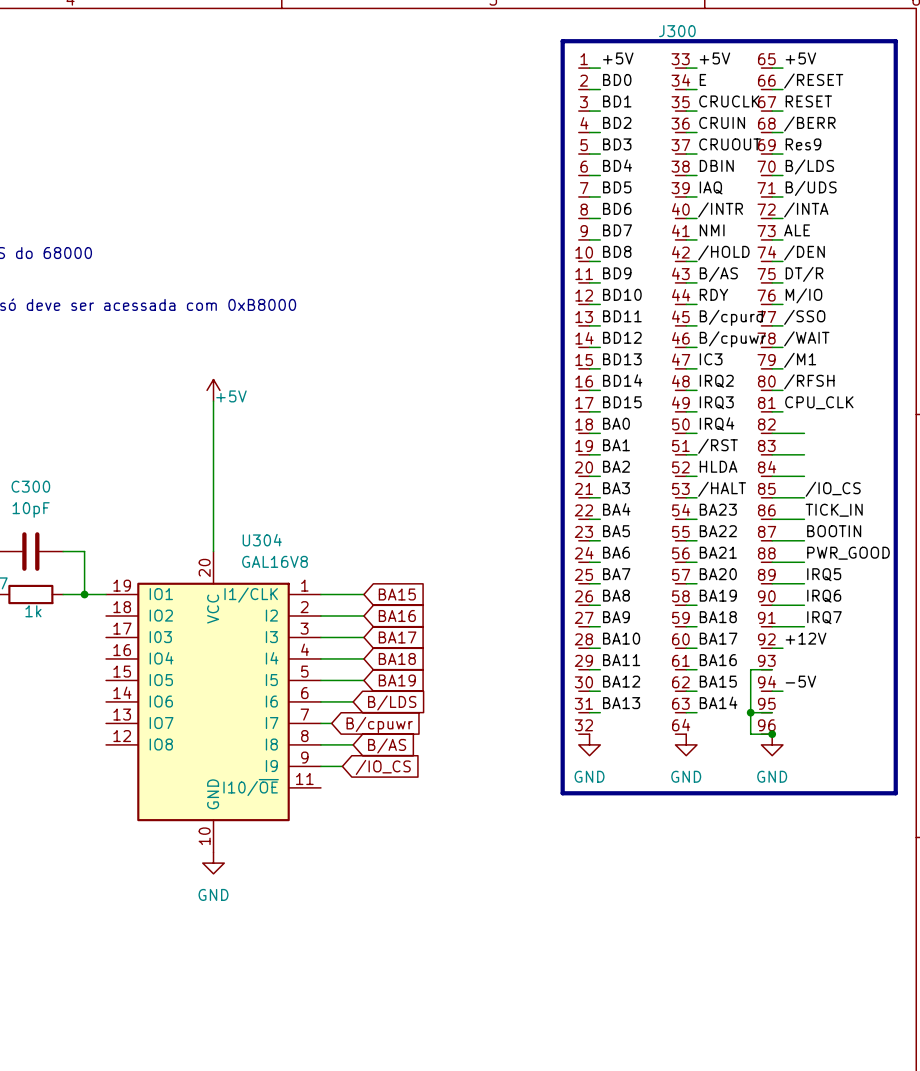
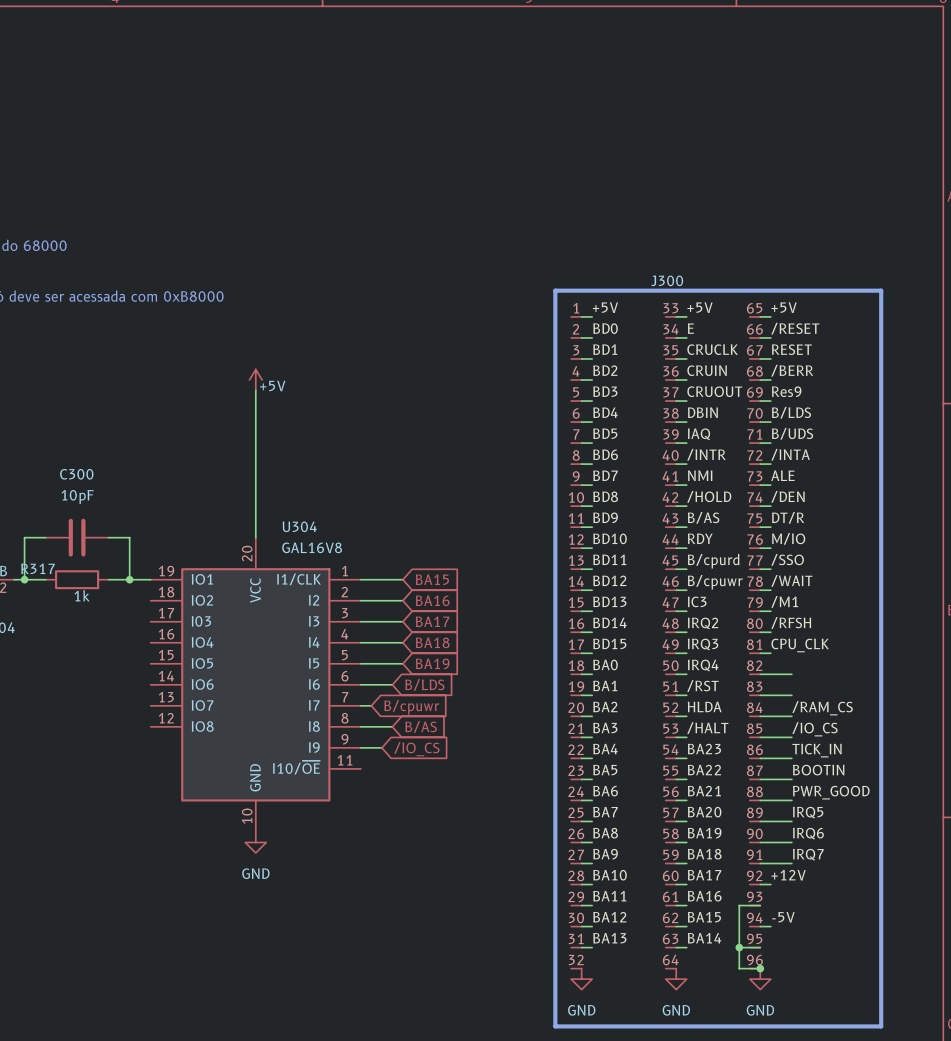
line: (562, 41) (895, 41) (895, 793) (562, 793) (562, 41) -> none
label: +5V (618, 58) -> none
label: +5V (714, 58) -> none
label: +5V (800, 58) -> none
wire: (589, 68) (600, 68) -> none
wire: (686, 68) (696, 68) -> none
wire: (772, 68) (782, 68) -> none
label: BD0 (617, 79) -> none
label: E (702, 79) -> none
label: /RESET (813, 80) -> none
wire: (589, 89) (600, 89) -> none
wire: (686, 89) (696, 89) -> none
wire: (772, 89) (782, 89) -> none
label: BD1 (617, 101) -> none
label: CRUCLK (729, 101) -> none
label: RESET (808, 101) -> none
wire: (589, 111) (600, 111) -> none
wire: (686, 111) (696, 111) -> none
wire: (772, 111) (782, 111) -> none
label: BD2 (617, 122) -> none
label: CRUIN (722, 122) -> none
label: /BERR (809, 123) -> none
wire: (589, 132) (600, 132) -> (581, 316) (592, 316)
wire: (686, 132) (696, 132) -> (676, 316) (686, 316)
wire: (772, 132) (782, 132) -> (760, 316) (770, 316)
label: BD3 (617, 144) -> none
label: CRUOUT (730, 144) -> none
label: Res9 (803, 144) -> none
wire: (589, 154) (600, 154) -> (581, 337) (592, 337)
wire: (686, 154) (696, 154) -> (676, 337) (686, 337)
wire: (772, 154) (782, 154) -> (760, 337) (770, 337)
label: BD4 (617, 165) -> none
label: DBIN (716, 165) -> none
label: B/LDS (809, 166) -> none
wire: (589, 175) (600, 175) -> (581, 358) (592, 358)
wire: (686, 175) (696, 175) -> (676, 358) (686, 358)
wire: (772, 175) (782, 175) -> (760, 358) (770, 358)
label: BD5 (617, 187) -> none
label: IAQ (711, 187) -> none
label: B/UDS (811, 188) -> none
wire: (589, 196) (600, 196) -> (581, 380) (592, 380)
wire: (686, 196) (696, 196) -> (676, 380) (686, 380)
wire: (772, 196) (782, 196) -> (760, 380) (770, 380)
label: BD6 (617, 208) -> none
label: /INTR (720, 209) -> none
label: /INTA (806, 209) -> none
wire: (589, 218) (600, 218) -> (581, 401) (592, 401)
wire: (686, 218) (696, 218) -> (676, 401) (686, 401)
wire: (772, 218) (782, 218) -> (760, 401) (770, 401)
label: BD7 (617, 230) -> none
label: NMI (712, 230) -> none
label: ALE (797, 230) -> none
wire: (589, 239) (600, 239) -> (581, 422) (592, 422)
wire: (686, 239) (696, 239) -> (676, 422) (686, 422)
wire: (772, 239) (782, 239) -> (760, 422) (770, 422)
label: BD8 (617, 251) -> none
label: /HOLD (723, 252) -> none
label: /DEN (804, 252) -> none
wire: (589, 261) (600, 261) -> (581, 443) (592, 443)
wire: (686, 261) (696, 261) -> (676, 443) (686, 443)
wire: (772, 261) (782, 261) -> (760, 443) (770, 443)
label: BD9 (617, 273) -> none
label: B/AS (718, 274) -> none
label: DT/R (804, 274) -> none
wire: (589, 282) (600, 282) -> (581, 464) (592, 464)
wire: (686, 282) (696, 282) -> (676, 464) (686, 464)
wire: (772, 282) (782, 282) -> (760, 464) (770, 464)
label: BD10 (622, 294) -> none
label: RDY (713, 294) -> none
label: M/IO (803, 295) -> none
line: none -> (555, 290) (881, 290) (881, 1026) (555, 1026) (555, 290)
wire: (589, 304) (600, 304) -> (581, 485) (592, 485)
wire: (686, 304) (696, 304) -> (676, 485) (686, 485)
wire: (772, 304) (782, 304) -> (760, 485) (770, 485)
label: none -> +5V (605, 307)
label: BD11 (622, 316) -> none
label: none -> +5V (700, 307)
label: none -> +5V (784, 307)
label: B/cpurd (731, 317) -> none
label: /SSO (804, 317) -> none
wire: (589, 325) (600, 325) -> (581, 506) (592, 506)
wire: (686, 325) (696, 325) -> (676, 506) (686, 506)
wire: (772, 325) (782, 325) -> (760, 506) (770, 506)
label: none -> BD0 (605, 328)
label: BD12 (622, 337) -> none
label: none -> E (690, 328)
label: none -> /RESET (795, 328)
label: /WAIT (806, 338) -> none
label: B/cpuwr (732, 339) -> none
wire: (589, 347) (600, 347) -> (581, 527) (592, 527)
wire: (686, 347) (696, 347) -> (676, 527) (686, 527)
wire: (772, 347) (782, 347) -> (760, 527) (770, 527)
label: none -> BD1 (605, 349)
label: BD13 (622, 359) -> none
label: none -> CRUCLK (712, 349)
label: IC3 (711, 359) -> none
label: none -> RESET (791, 349)
label: /M1 (800, 360) -> none
wire: (589, 368) (600, 368) -> (581, 548) (592, 548)
wire: (686, 368) (696, 368) -> (676, 548) (686, 548)
wire: (772, 368) (782, 368) -> (760, 548) (770, 548)
label: none -> BD2 (605, 370)
label: BD14 (622, 380) -> none
label: none -> CRUIN (707, 370)
label: IRQ2 (716, 381) -> none
label: none -> /BERR (792, 370)
label: /RFSH (809, 381) -> none
wire: (589, 390) (600, 390) -> (581, 569) (592, 569)
wire: (686, 390) (696, 390) -> (676, 569) (686, 569)
wire: (772, 390) (782, 390) -> (760, 569) (770, 569)
J300 position: (675, 401) -> (665, 642)
label: none -> BD3 (605, 391)
label: BD15 (622, 402) -> none
label: none -> CRUOUT (714, 391)
label: IRQ3 (716, 402) -> none
label: none -> Res9 (786, 391)
label: CPU_CLK (819, 402) -> none
wire: (589, 411) (600, 411) -> (581, 590) (592, 590)
wire: (686, 411) (696, 411) -> (676, 590) (686, 590)
wire: (772, 411) (782, 411) -> (760, 590) (770, 590)
label: none -> BD4 (605, 412)
label: BA0 (616, 423) -> none
label: none -> DBIN (702, 412)
label: IRQ4 (717, 424) -> none
label: none -> B/LDS (791, 412)
wire: (589, 433) (600, 433) -> (581, 611) (592, 611)
wire: (686, 433) (696, 433) -> (676, 611) (686, 611)
wire: (772, 433) (804, 433) -> none
label: none -> BD5 (605, 433)
label: BA1 (616, 445) -> none
label: none -> IAQ (698, 434)
label: /RST (718, 446) -> none
label: none -> B/UDS (792, 433)
wire: (589, 454) (600, 454) -> (581, 632) (592, 632)
wire: (686, 454) (696, 454) -> (676, 632) (686, 632)
wire: (772, 454) (804, 454) -> none
label: none -> BD6 (605, 454)
label: BA2 (616, 466) -> none
label: HLDA (718, 466) -> none
label: none -> /INTR (706, 454)
label: none -> /INTA (790, 454)
wire: (589, 476) (600, 476) -> (581, 653) (592, 653)
wire: (686, 476) (696, 476) -> (676, 653) (686, 653)
wire: (772, 476) (804, 476) -> none
label: none -> BD7 (605, 475)
label: BA3 (616, 488) -> none
label: none -> NMI (700, 475)
label: none -> ALE (782, 475)
label: /HALT (722, 489) -> none
label: /IO_CS (833, 489) -> none
wire: (589, 497) (600, 497) -> (581, 674) (592, 674)
wire: (686, 497) (696, 497) -> (676, 674) (686, 674)
wire: (772, 497) (804, 497) -> (760, 674) (791, 674)
label: none -> BD8 (605, 496)
label: BA4 (616, 509) -> none
label: BA23 (718, 509) -> none
label: none -> /HOLD (709, 496)
label: none -> /DEN (788, 496)
label: TICK_IN (834, 510) -> none
wire: (589, 519) (600, 519) -> (581, 695) (592, 695)
wire: (686, 519) (696, 519) -> (676, 695) (686, 695)
wire: (772, 519) (804, 519) -> none
label: none -> BD9 (605, 517)
label: BA5 (616, 531) -> none
label: BA22 (718, 531) -> none
label: BOOTIN (834, 531) -> none
label: none -> B/AS (703, 517)
label: none -> DT/R (788, 517)
wire: (589, 540) (600, 540) -> (581, 716) (592, 716)
wire: (686, 540) (696, 540) -> (676, 716) (686, 716)
wire: (772, 540) (804, 540) -> none
label: none -> BD10 (610, 538)
label: BA6 (616, 552) -> none
label: none -> RDY (700, 538)
label: BA21 (718, 552) -> none
label: none -> M/IO (788, 538)
label: PWR_GOOD (848, 553) -> none
wire: (589, 562) (600, 562) -> (581, 737) (592, 737)
wire: (686, 562) (696, 562) -> (676, 737) (686, 737)
wire: (772, 562) (804, 562) -> (760, 737) (791, 737)
label: none -> BD11 (609, 559)
label: BA7 (616, 574) -> none
label: BA20 (718, 574) -> none
label: IRQ5 (824, 574) -> none
label: none -> B/cpurd (713, 561)
label: none -> /SSO (787, 559)
wire: (589, 583) (600, 583) -> (581, 758) (592, 758)
wire: (686, 583) (696, 583) -> (676, 758) (686, 758)
wire: (772, 583) (804, 583) -> (760, 758) (791, 758)
label: none -> BD12 (609, 580)
label: BA8 (616, 595) -> none
label: BA19 (718, 595) -> none
label: none -> /WAIT (791, 580)
label: IRQ6 (824, 596) -> none
label: none -> B/cpuwr (715, 582)
wire: (589, 605) (600, 605) -> (581, 779) (592, 779)
wire: (686, 605) (696, 605) -> (676, 779) (686, 779)
wire: (772, 605) (804, 605) -> (760, 779) (791, 779)
label: none -> BD13 (609, 601)
label: BA9 (616, 617) -> none
label: none -> IC3 (697, 601)
label: BA18 (718, 617) -> none
label: IRQ7 (824, 617) -> none
label: none -> /M1 (784, 601)
wire: (589, 626) (600, 626) -> (581, 800) (592, 800)
wire: (686, 626) (696, 626) -> (676, 800) (686, 800)
wire: (772, 626) (804, 626) -> (760, 800) (791, 800)
label: none -> BD14 (609, 622)
label: BA10 (621, 638) -> none
label: BA17 (718, 638) -> none
label: +12V (806, 638) -> none
label: none -> IRQ2 (703, 623)
label: none -> /RFSH (791, 622)
wire: (589, 648) (600, 648) -> (581, 821) (592, 821)
wire: (686, 648) (696, 648) -> (676, 821) (686, 821)
wire: (772, 648) (782, 648) -> (760, 653) (770, 653)
label: none -> BD15 (609, 643)
label: BA11 (621, 660) -> none
label: none -> IRQ3 (703, 644)
label: BA16 (718, 660) -> none
label: none -> CPU_CLK (800, 645)
wire: (589, 669) (600, 669) -> (581, 842) (592, 842)
wire: (686, 669) (696, 669) -> (676, 842) (686, 842)
wire: (772, 669) (750, 669) (750, 734) -> (760, 716) (781, 716)
label: none -> BA0 (605, 664)
label: BA12 (621, 681) -> none
label: none -> IRQ4 (703, 665)
label: BA15 (718, 681) -> none
label: -5V (800, 681) -> none
wire: (589, 691) (600, 691) -> (581, 863) (592, 863)
wire: (686, 691) (696, 691) -> (676, 863) (686, 863)
wire: (772, 691) (782, 691) -> (760, 632) (770, 632)
label: BA14 (718, 702) -> none
label: none -> BA1 (605, 685)
label: BA13 (621, 703) -> none
label: none -> /RST (702, 686)
wire: (589, 712) (600, 712) -> (581, 884) (592, 884)
wire: (686, 712) (696, 712) -> (676, 884) (686, 884)
wire: none -> (760, 695) (781, 695)
junction: (750, 712) -> none
wire: (761, 712) (772, 712) -> (760, 611) (770, 611)
label: none -> BA2 (605, 706)
label: none -> HLDA (704, 706)
label: none -> /RAM_CS (822, 708)
wire: (761, 734) (772, 734) -> (760, 884) (770, 884)
junction: (772, 734) -> none
power symbol: GND (589, 744) -> none
power symbol: GND (686, 744) -> none
power symbol: GND (772, 744) -> none
label: none -> BA3 (605, 728)
label: none -> /HALT (707, 728)
label: none -> /IO_CS (814, 729)
label: none -> BA4 (605, 749)
label: none -> BA23 (704, 749)
label: none -> TICK_IN (817, 750)
label: none -> BA5 (605, 770)
label: none -> BA22 (704, 770)
label: none -> BOOTIN (818, 770)
label: none -> BA6 (605, 791)
label: none -> BA21 (704, 791)
label: none -> PWR_GOOD (831, 792)
label: none -> BA7 (605, 812)
label: none -> BA20 (704, 812)
label: none -> IRQ5 (808, 812)
wire: none -> (760, 821) (791, 821)
label: none -> BA8 (605, 833)
label: none -> BA19 (704, 833)
label: none -> IRQ6 (808, 833)
wire: none -> (760, 842) (791, 842)
label: none -> BA9 (605, 854)
label: none -> BA18 (704, 854)
label: none -> IRQ7 (808, 854)
wire: none -> (760, 863) (791, 863)
label: none -> BA10 (610, 875)
label: none -> BA17 (704, 875)
label: none -> +12V (788, 875)
label: none -> BA11 (609, 896)
label: none -> BA16 (704, 896)
wire: none -> (581, 905) (592, 905)
wire: none -> (676, 905) (686, 905)
wire: none -> (760, 905) (739, 905) (739, 968) (760, 968)
label: none -> BA12 (609, 917)
label: none -> BA15 (704, 917)
label: none -> -5V (783, 917)
wire: none -> (581, 926) (592, 926)
wire: none -> (676, 926) (686, 926)
wire: none -> (760, 926) (770, 926)
label: none -> BA13 (609, 938)
label: none -> BA14 (704, 938)
wire: none -> (581, 947) (592, 947)
wire: none -> (676, 947) (686, 947)
wire: none -> (739, 947) (760, 947)
junction: none -> (739, 947)
junction: none -> (760, 968)
power symbol: none -> GND (581, 979)
power symbol: none -> GND (676, 979)
power symbol: none -> GND (760, 979)

